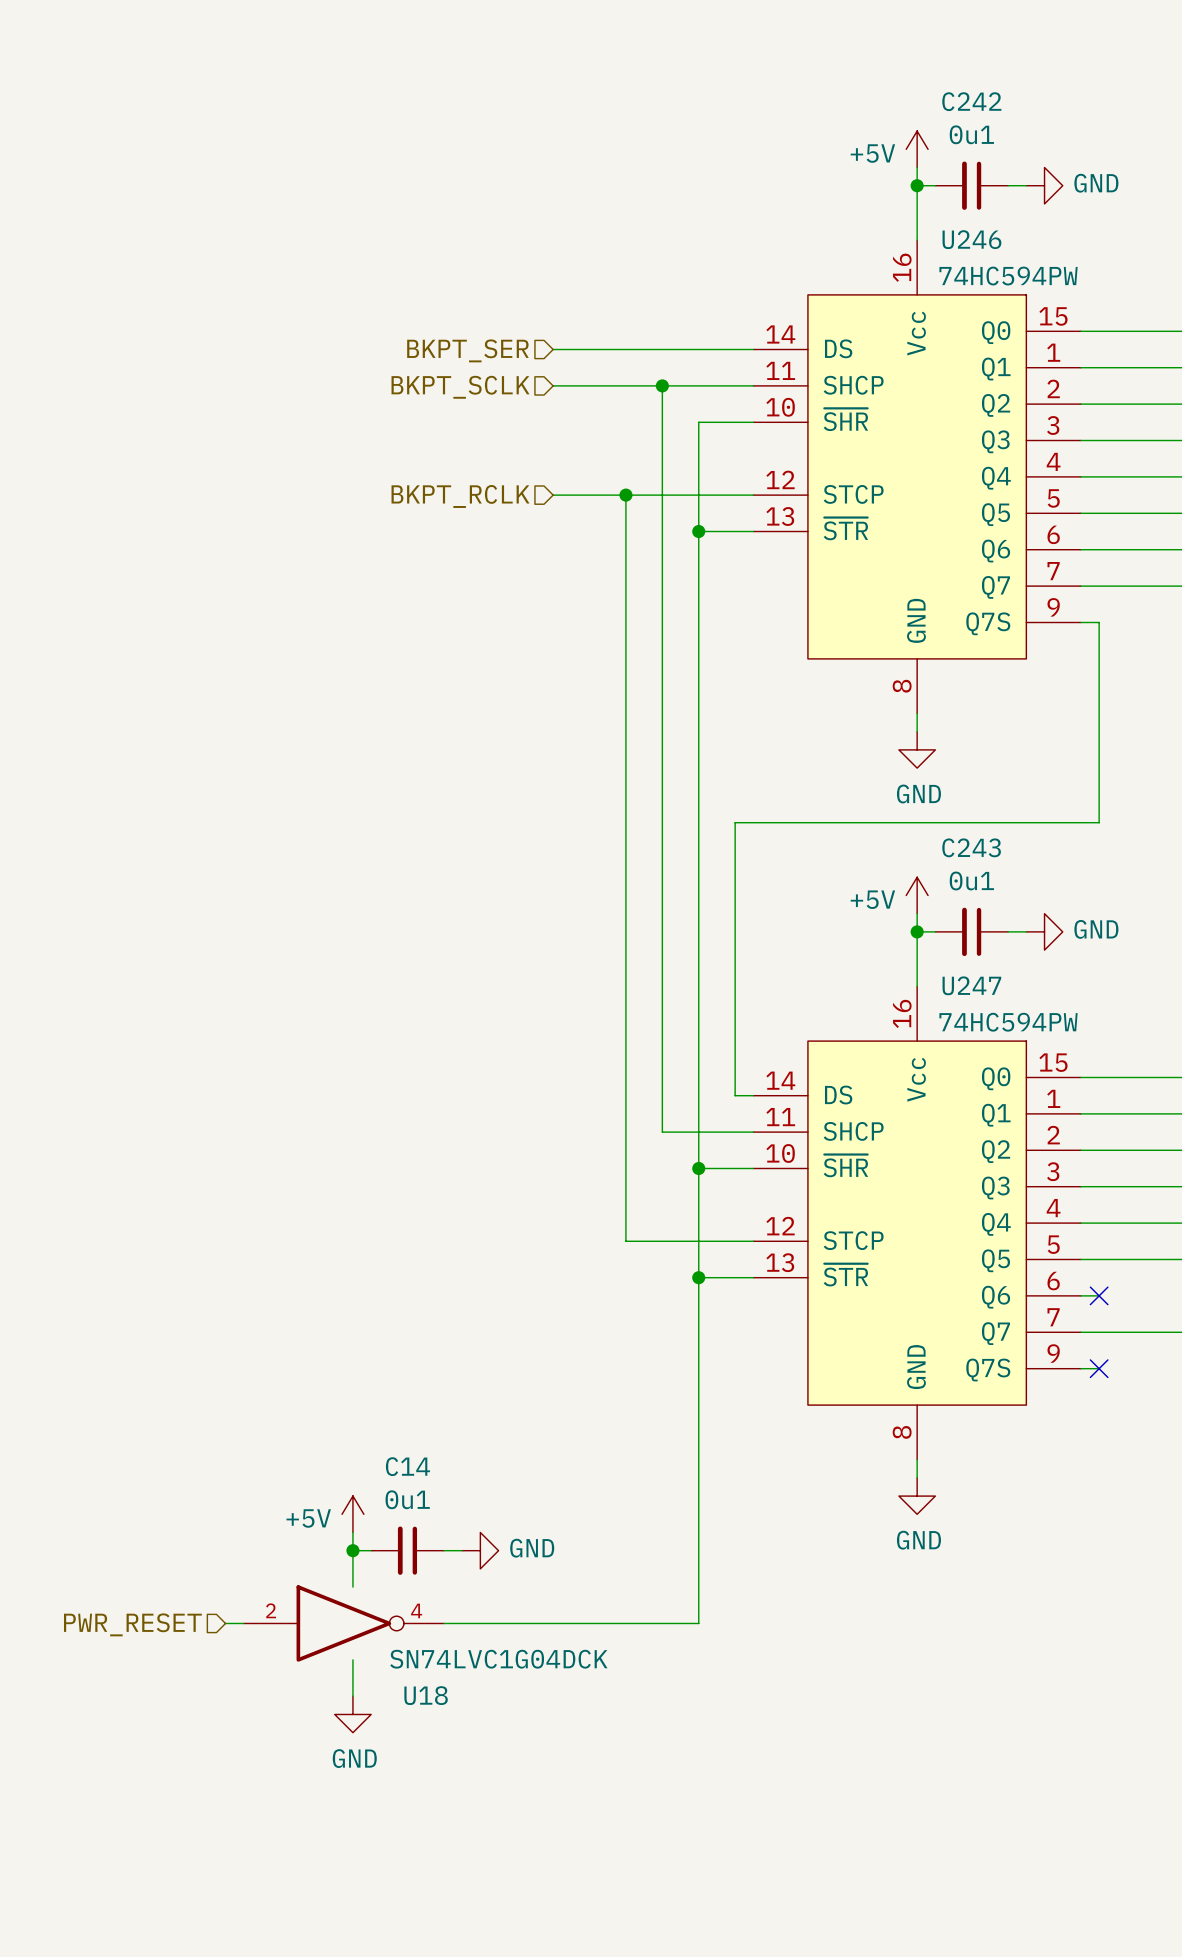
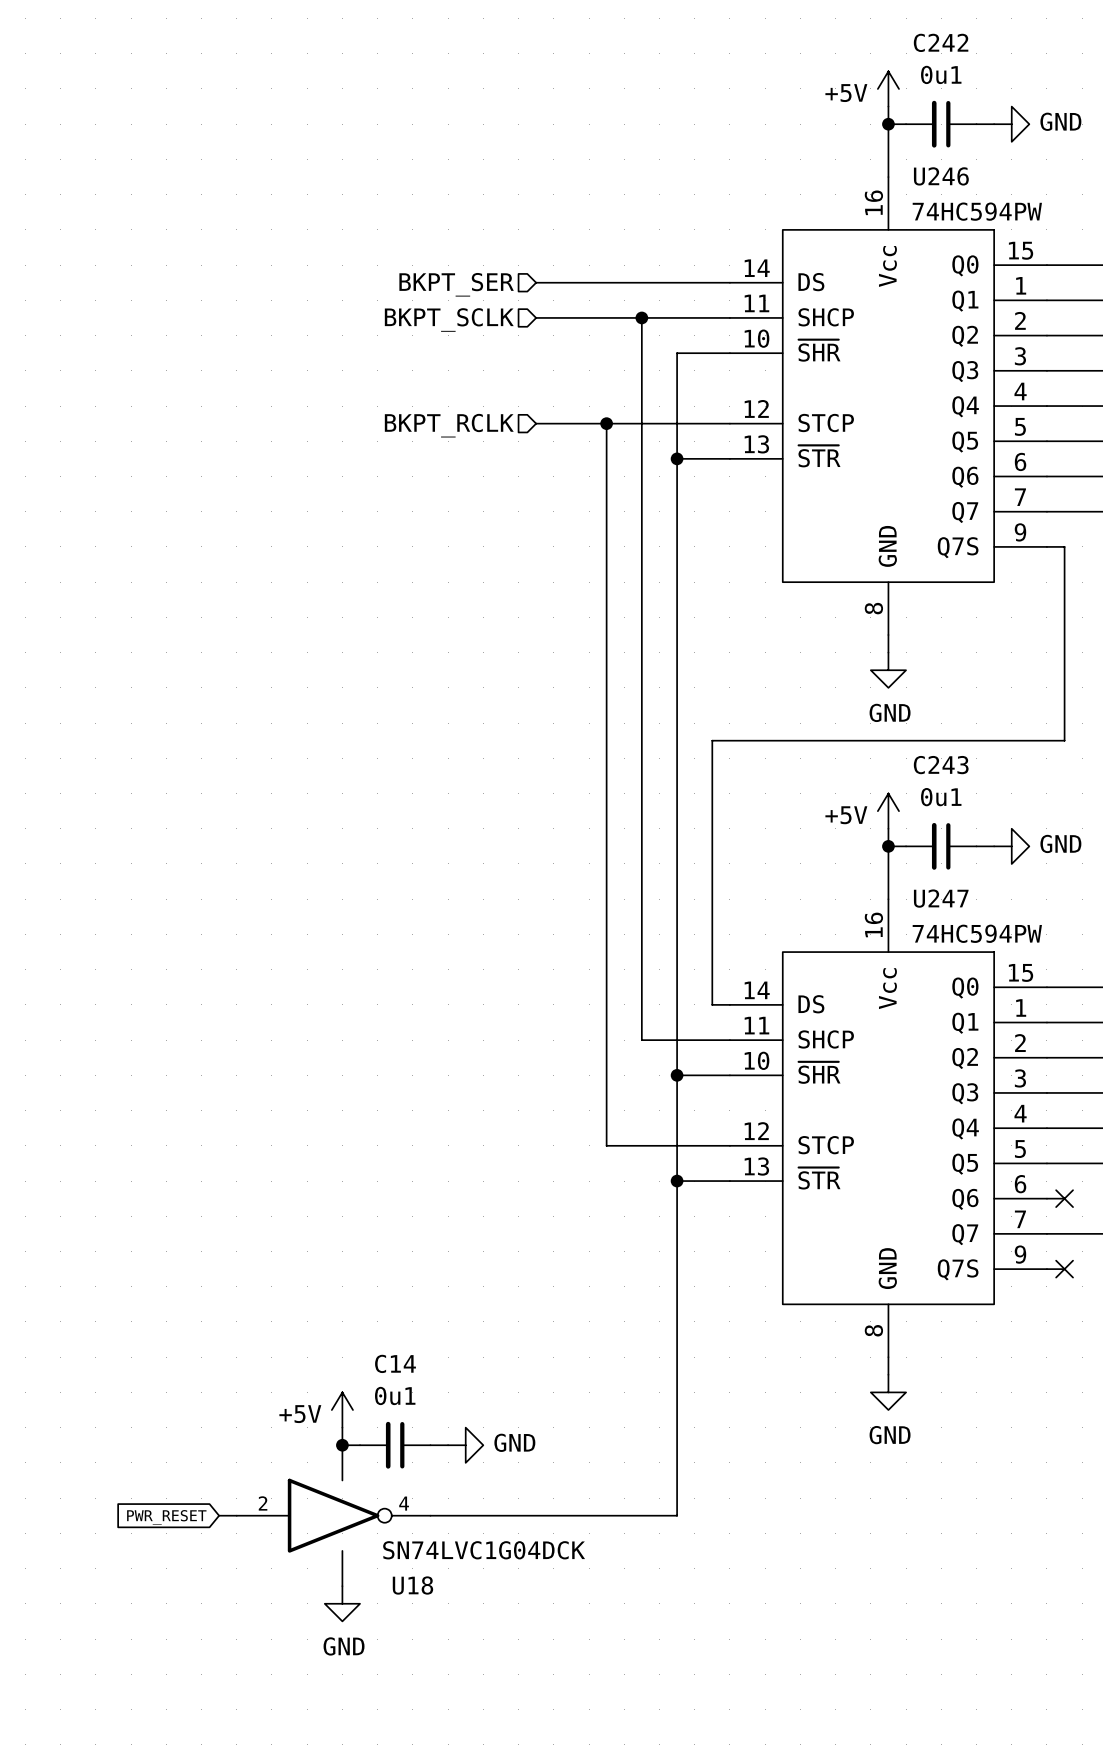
hierarchical label: PWR_RESET (132, 1624) -> none
global label: none -> PWR_RESET (166, 1517)

